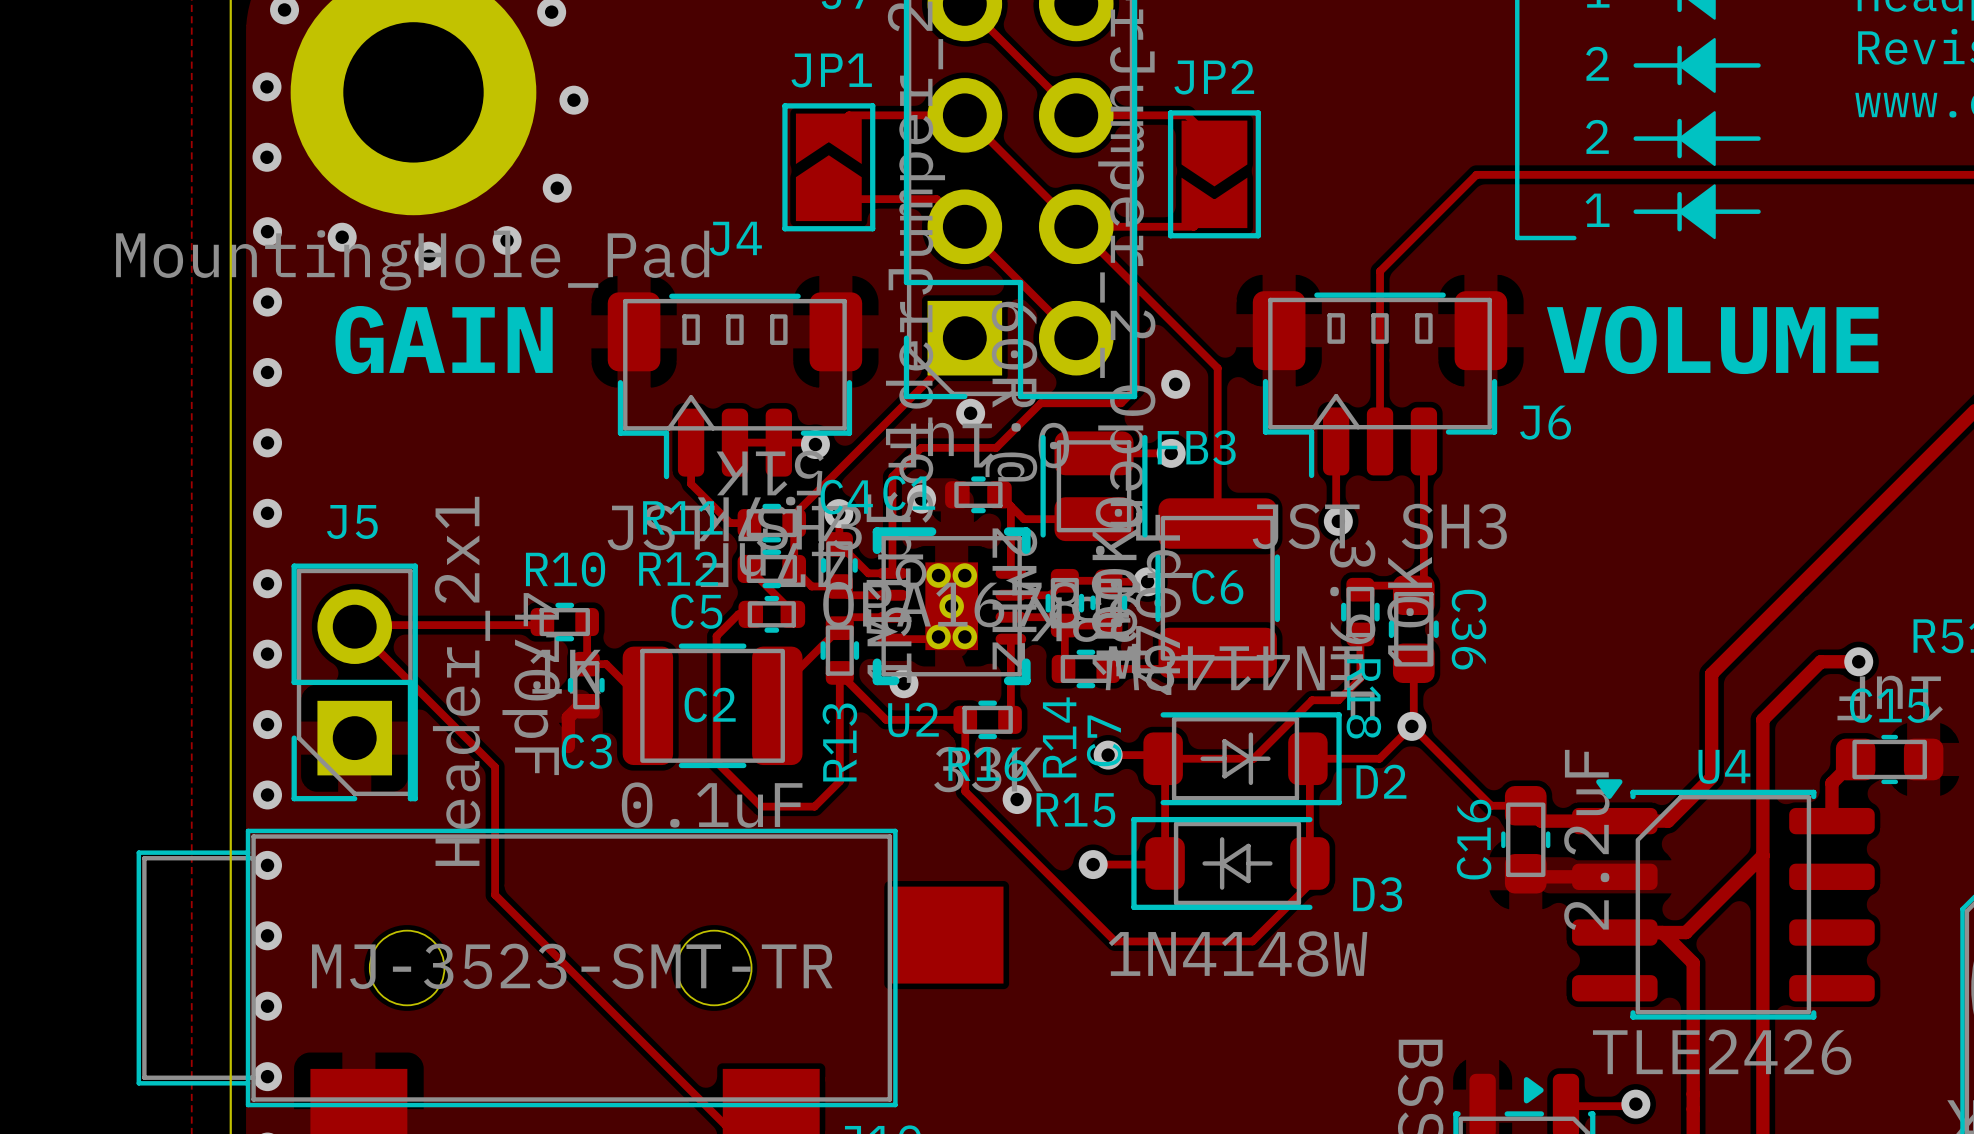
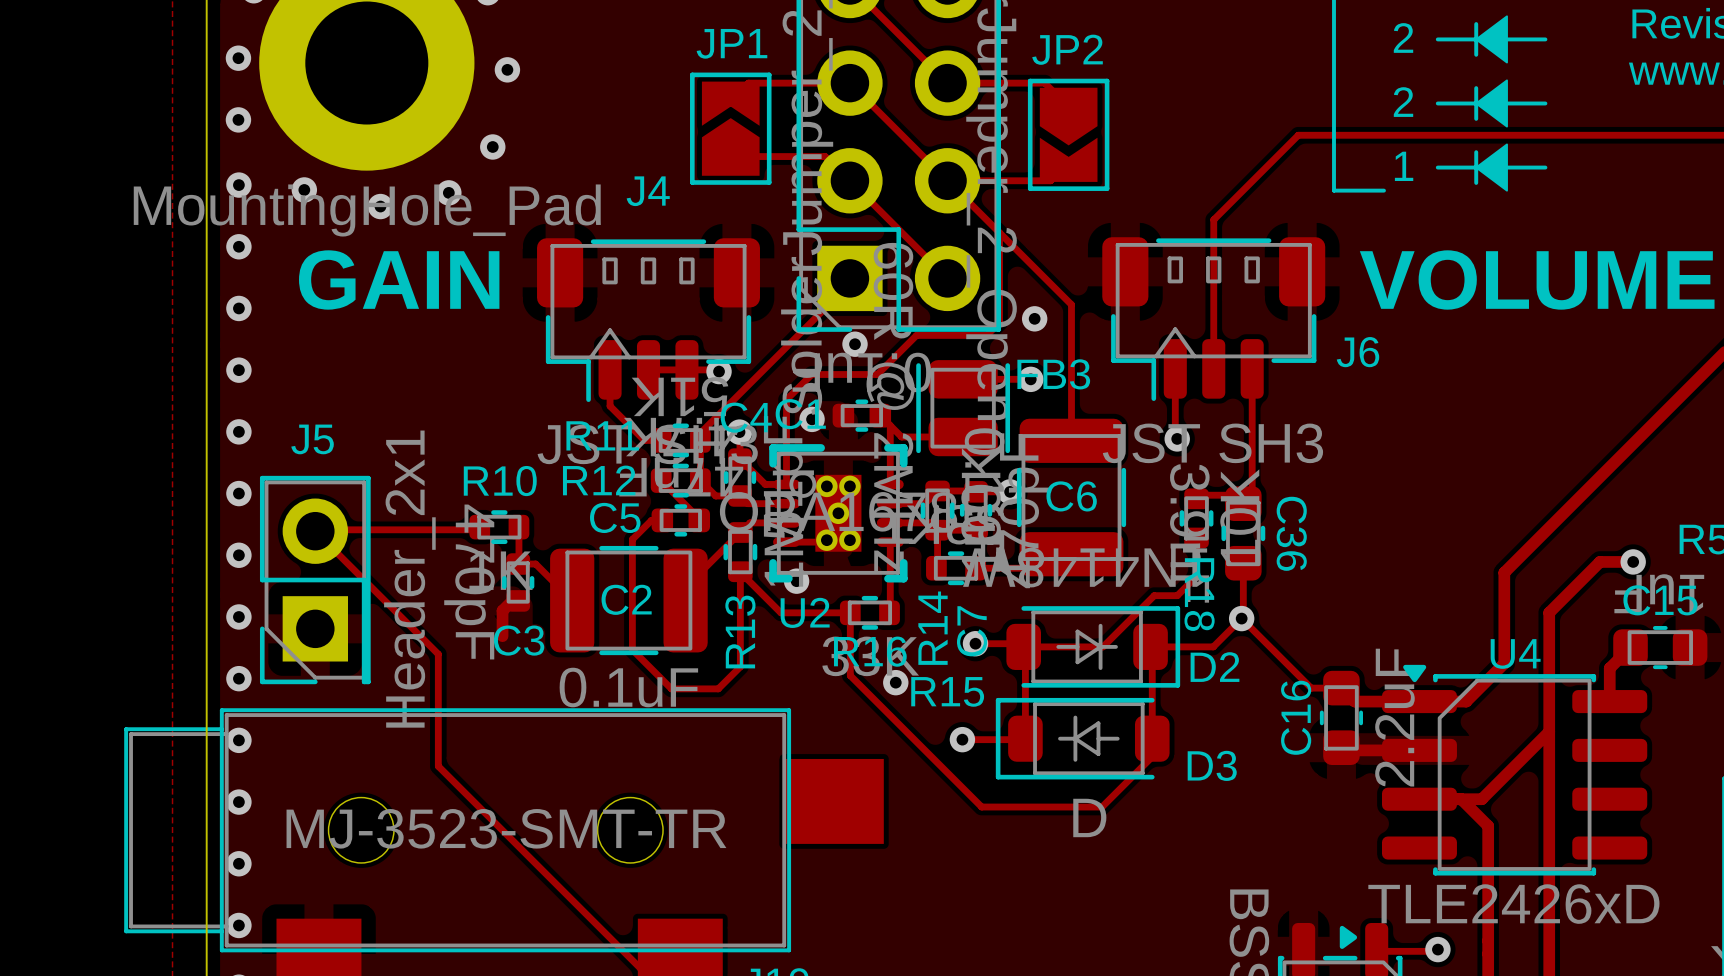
D3 value: 1N4148W (1238, 953) -> D (1089, 817)
U4 value: TLE2426 (1722, 1052) -> TLE2426xD (1513, 904)

